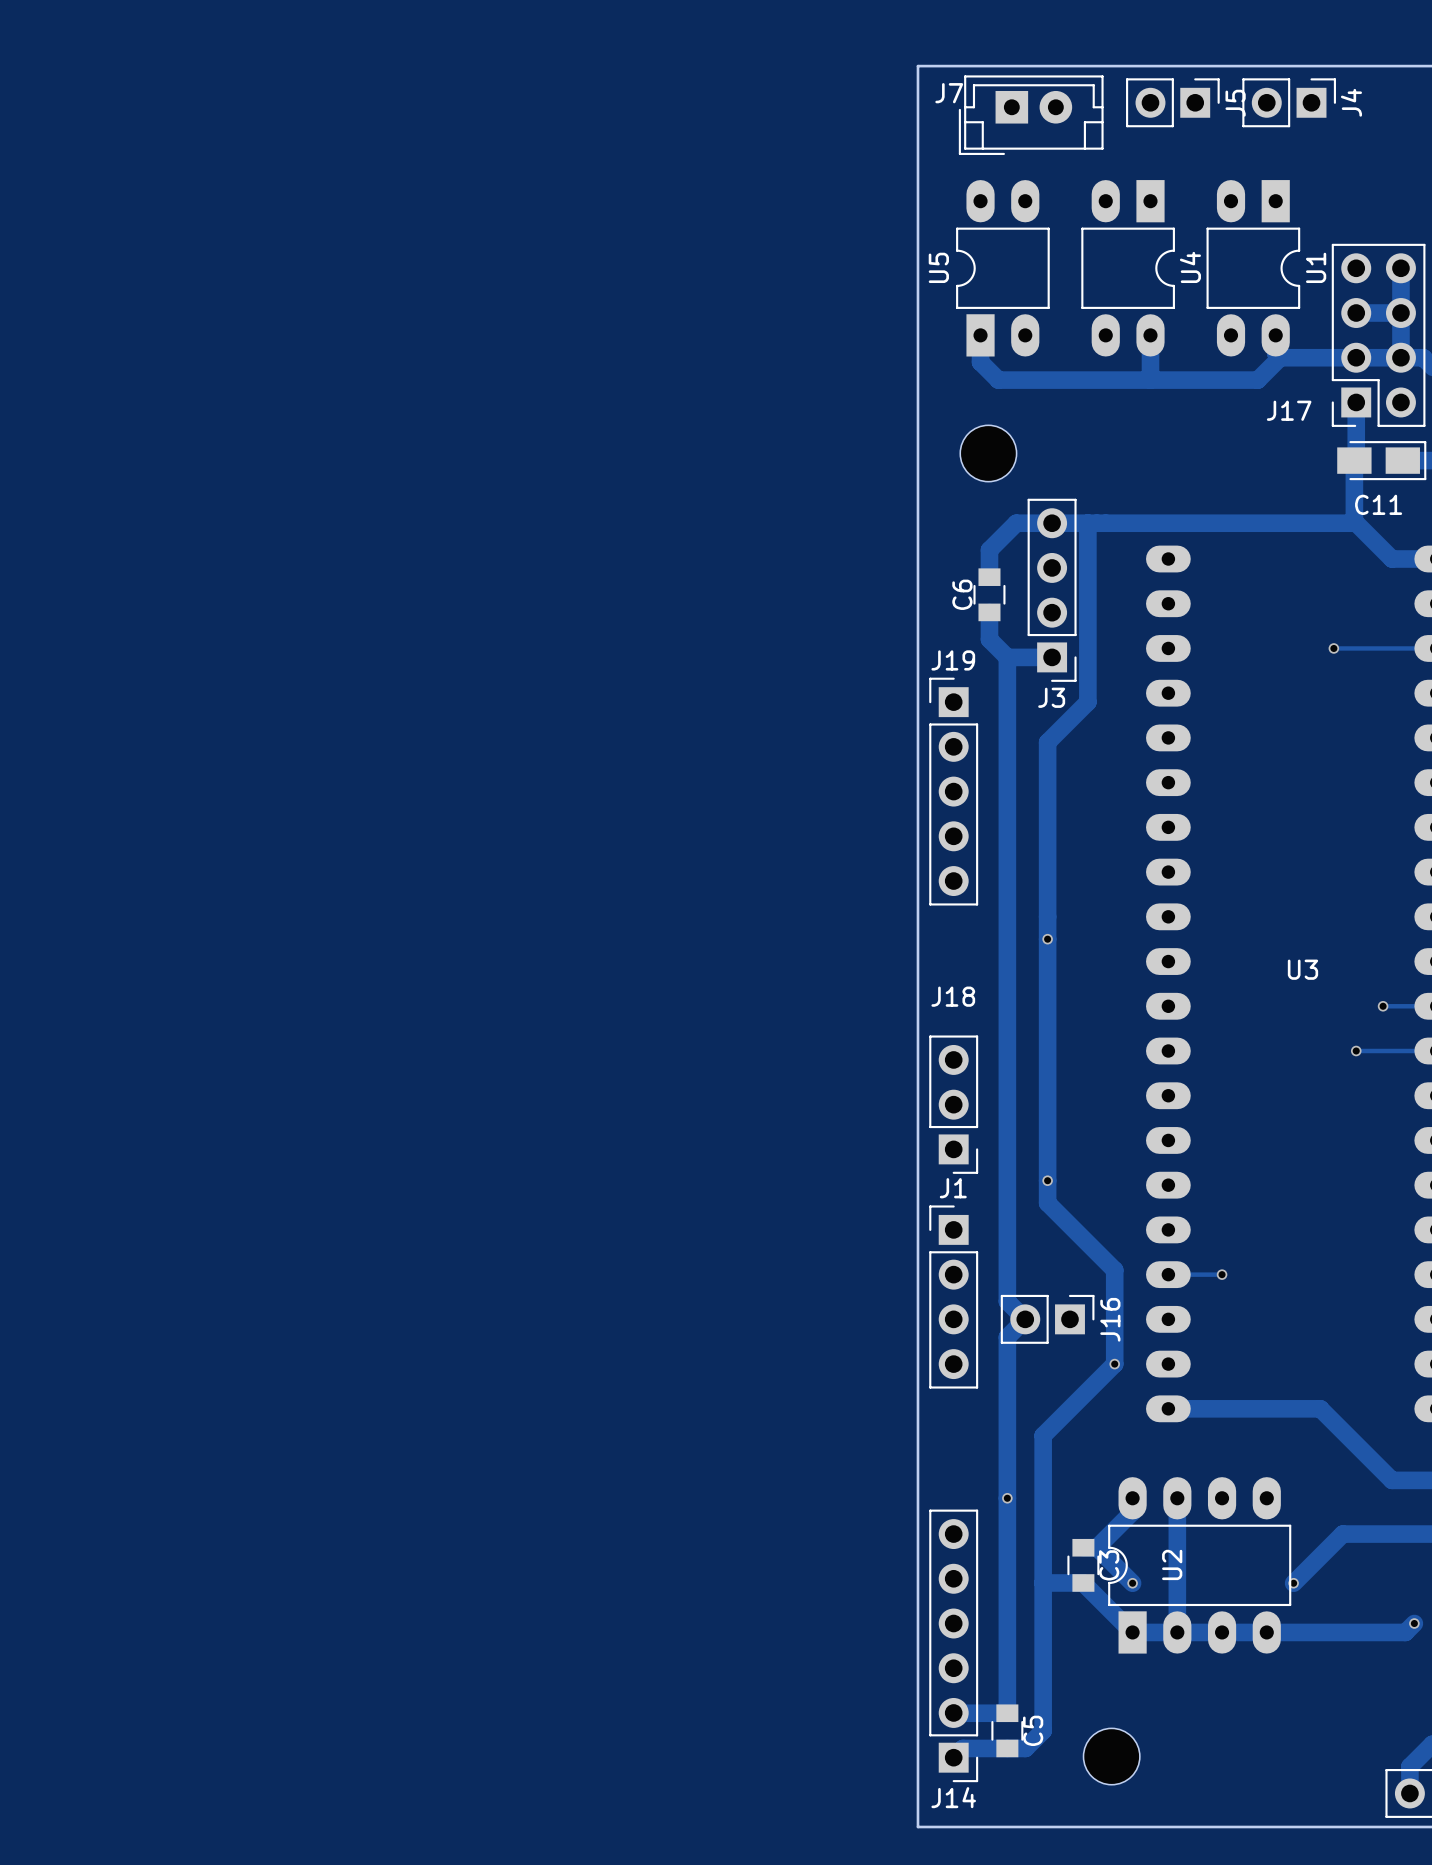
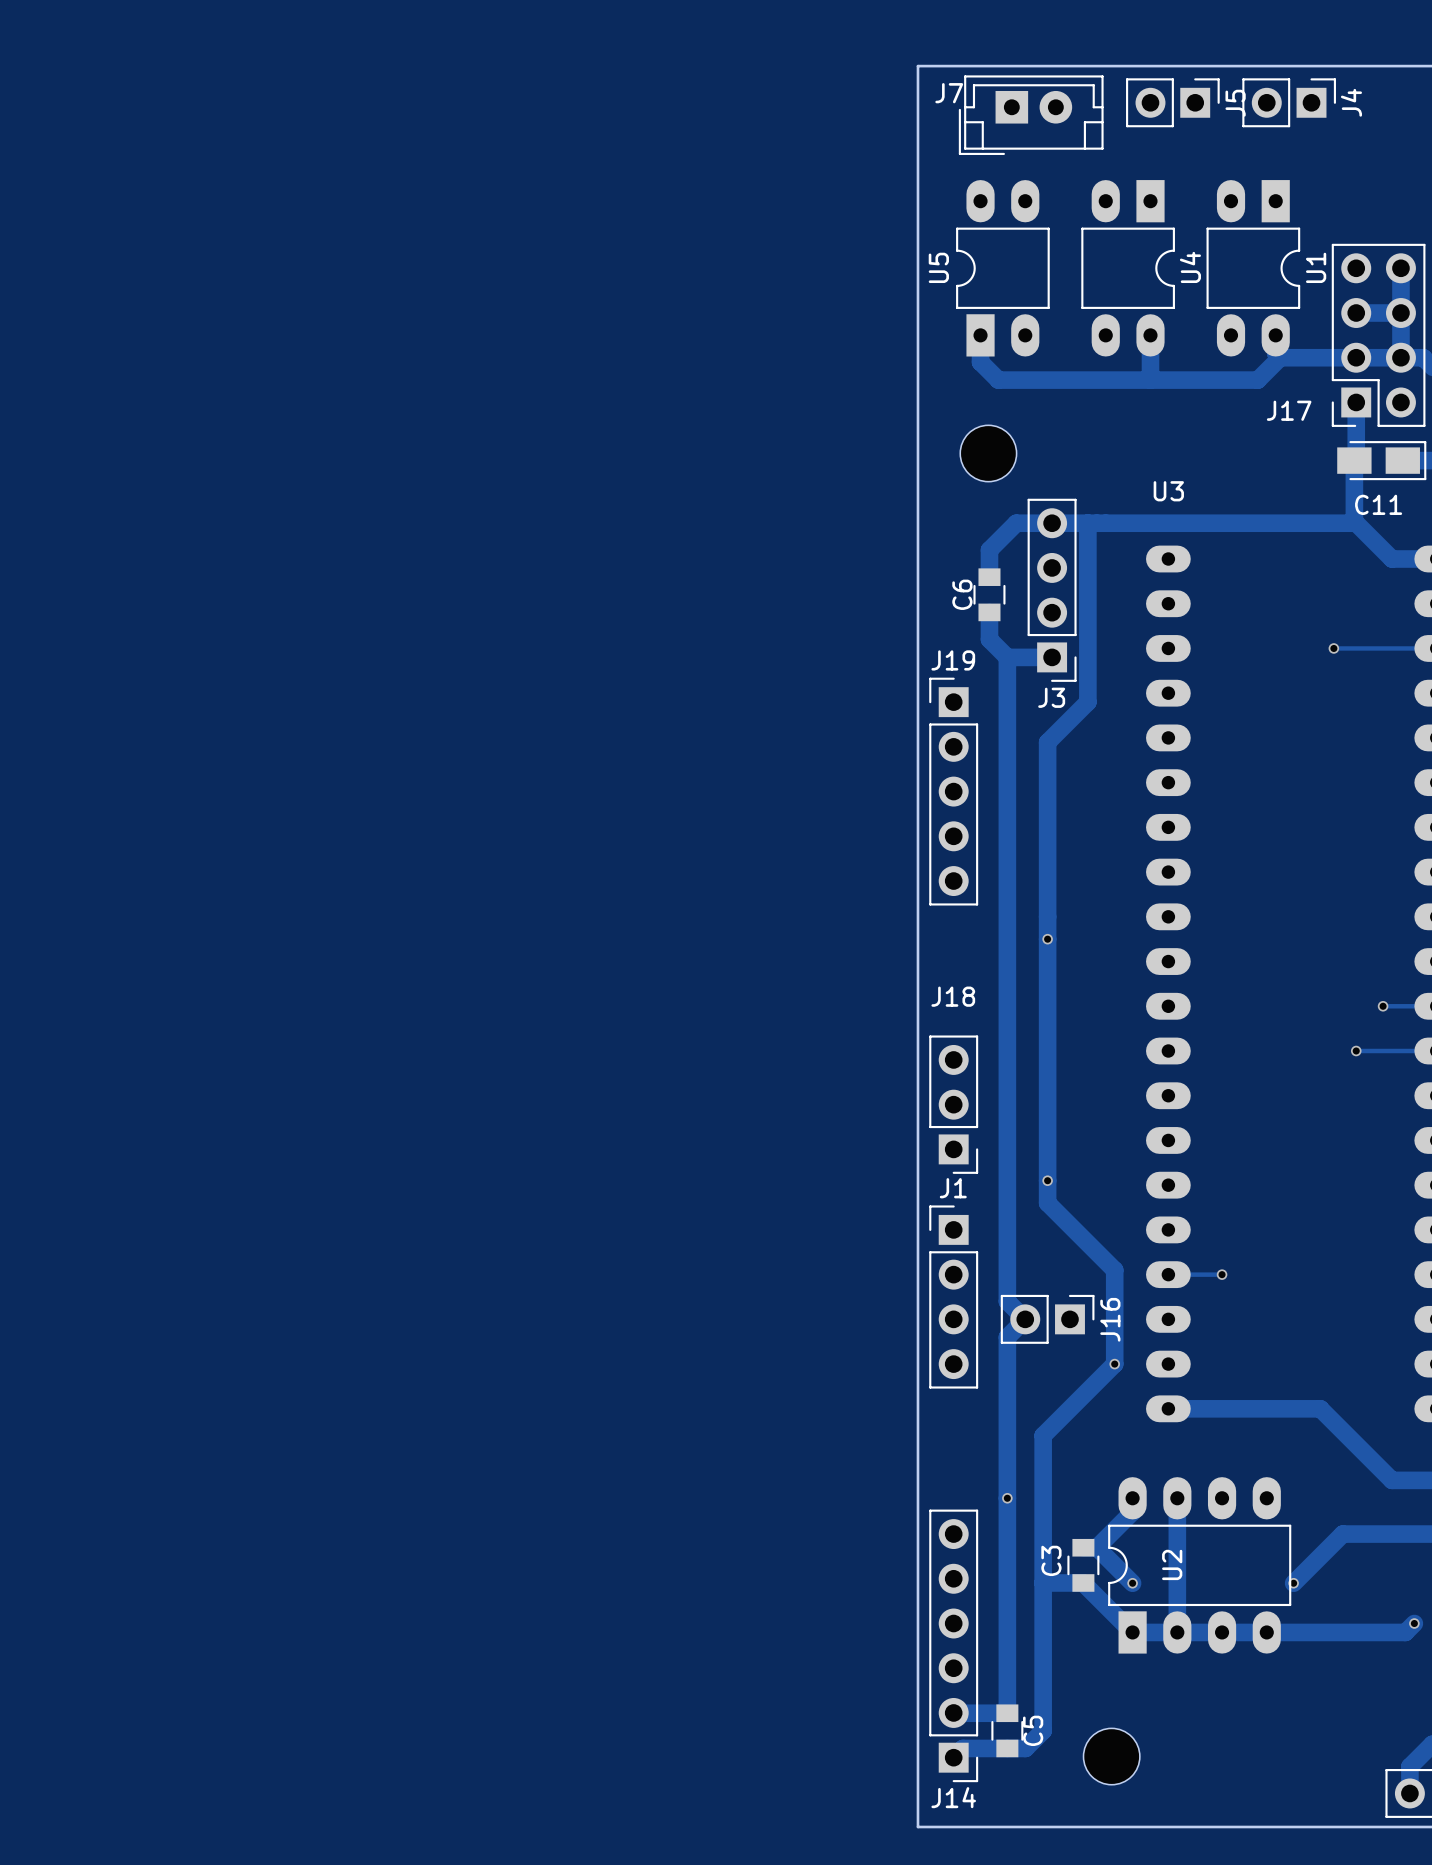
U3 name position: U3 (1302, 969) -> U3 (1168, 491)
C3 name position: C3 (1109, 1565) -> C3 (1051, 1560)

